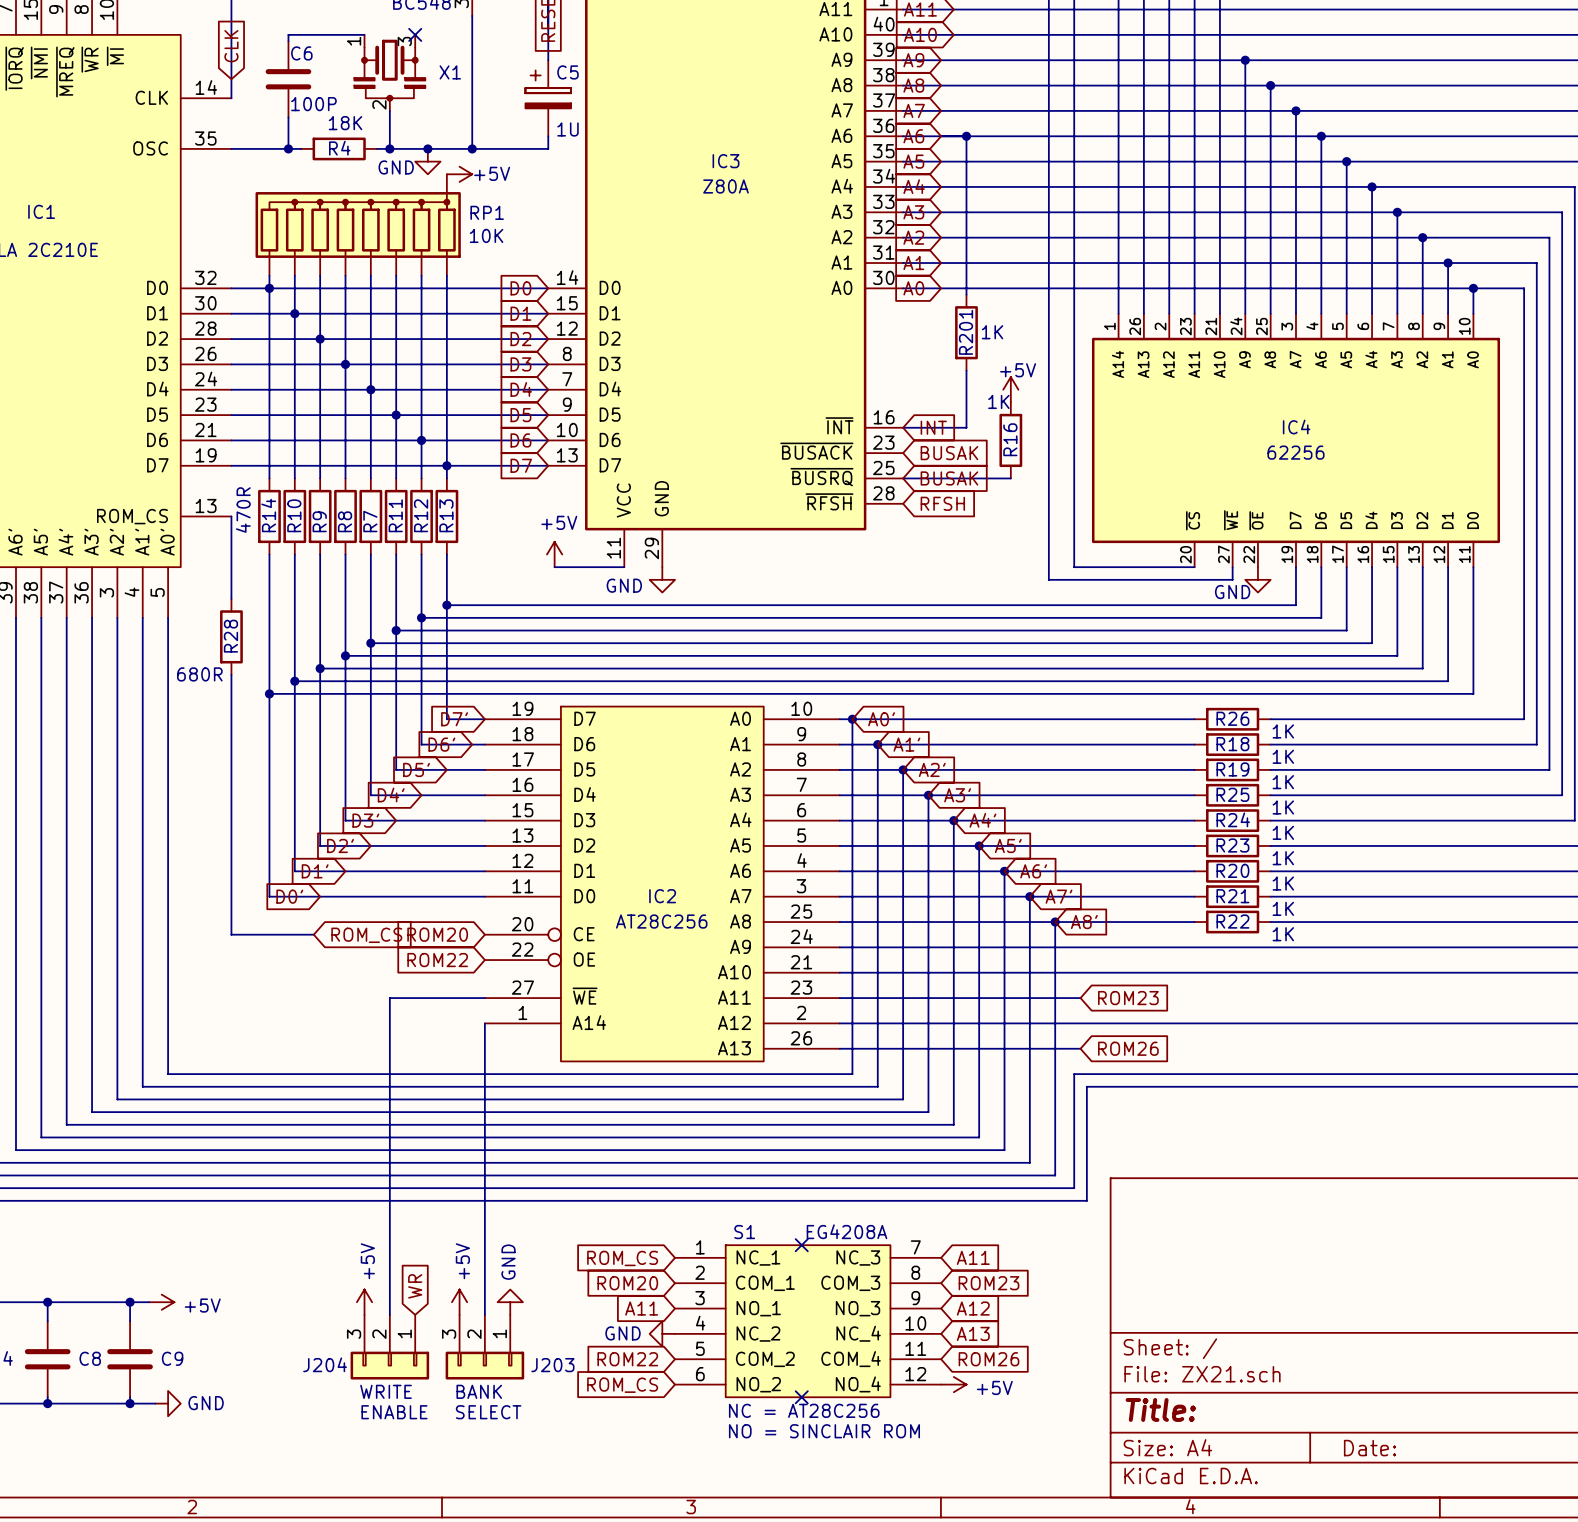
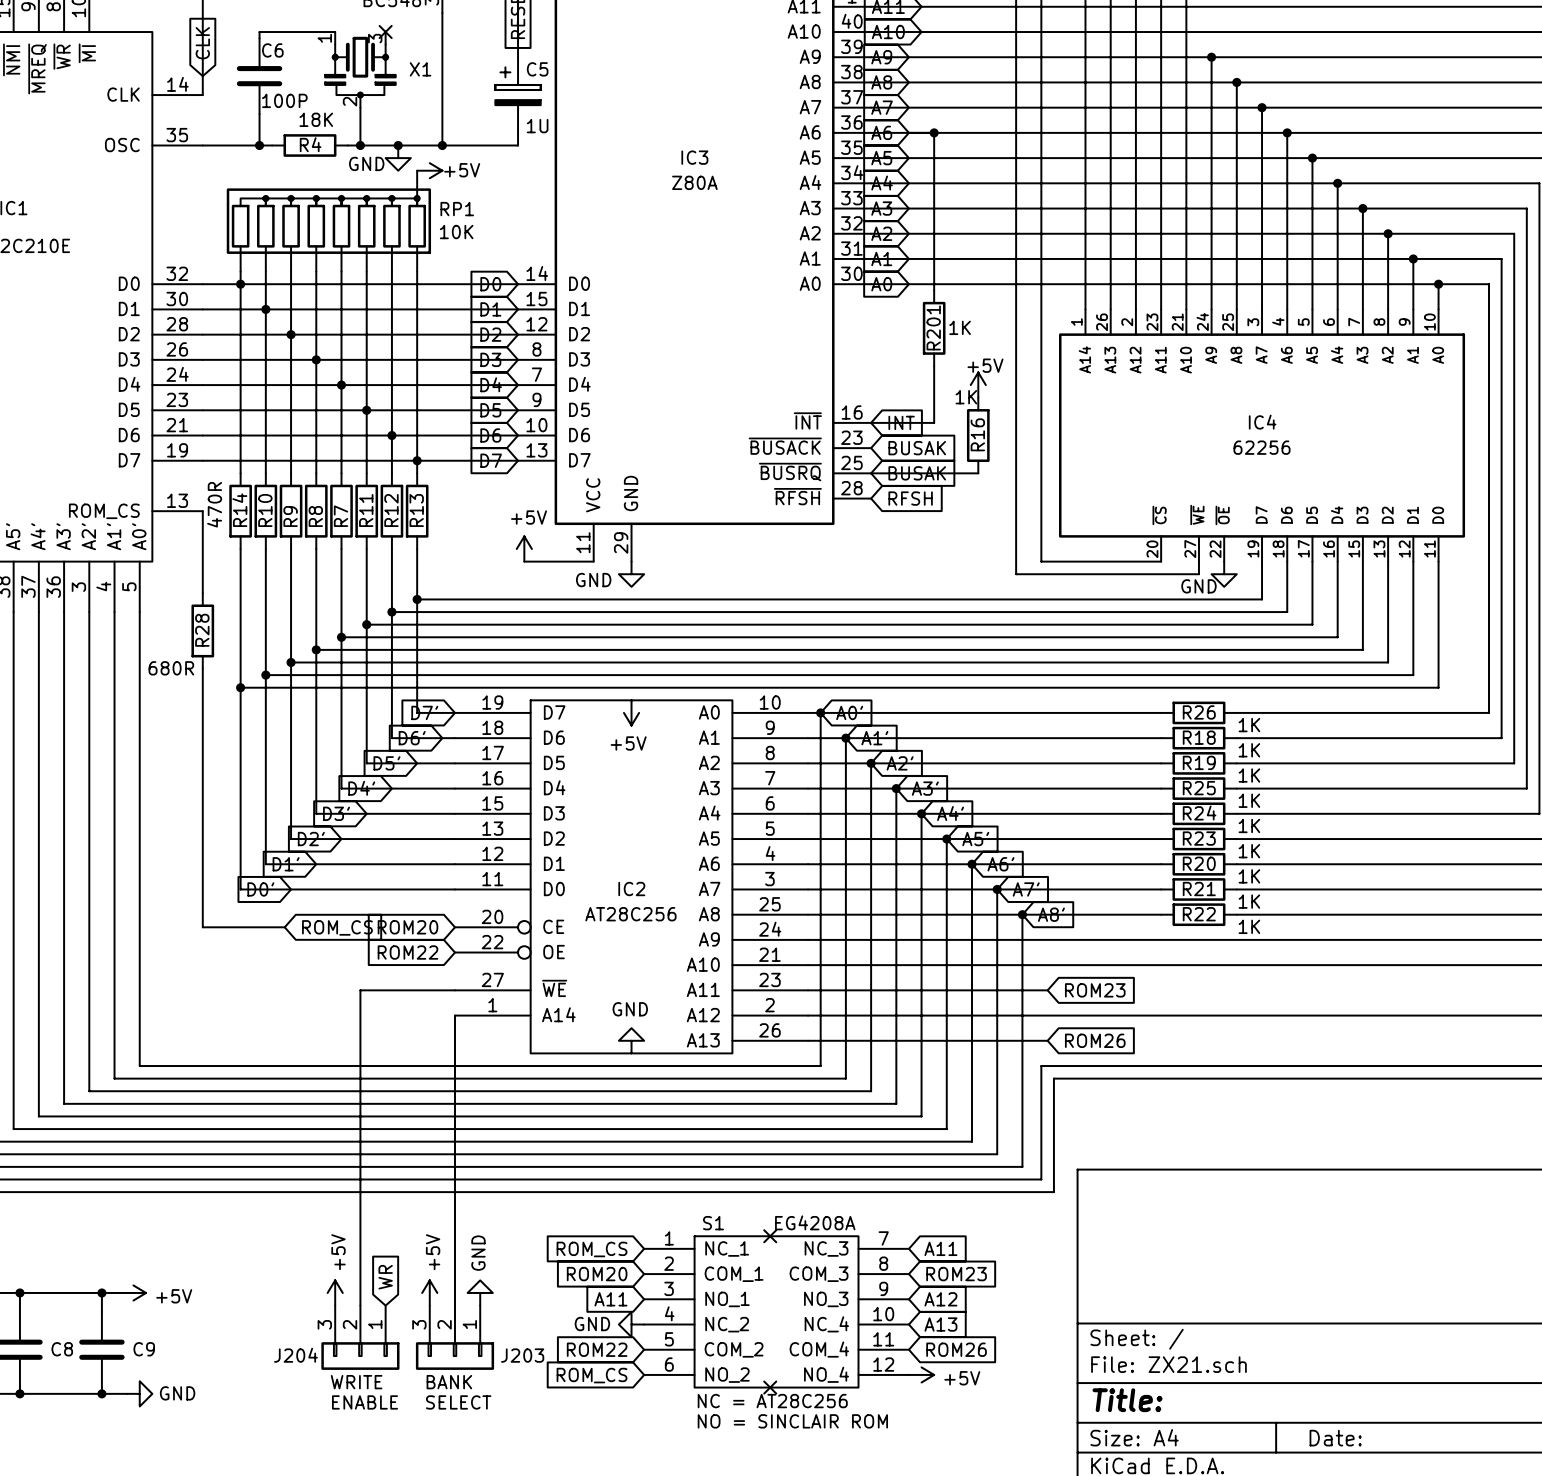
power symbol: none -> +5V (631, 712)
power symbol: none -> GND (631, 1040)

